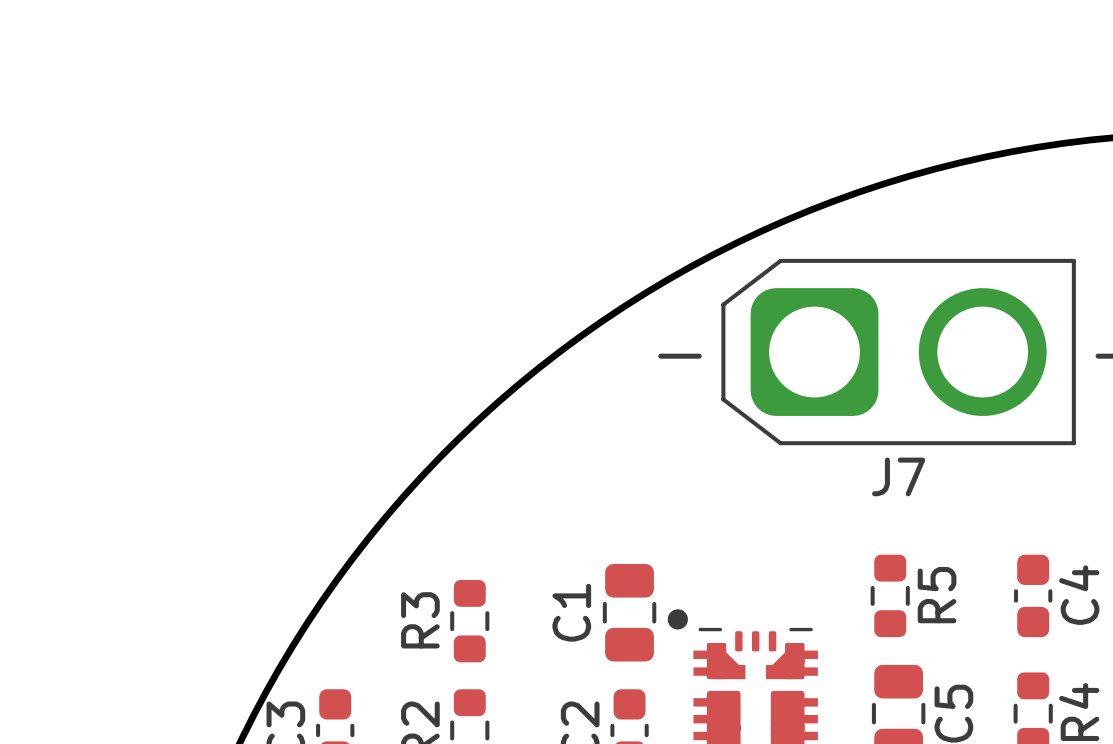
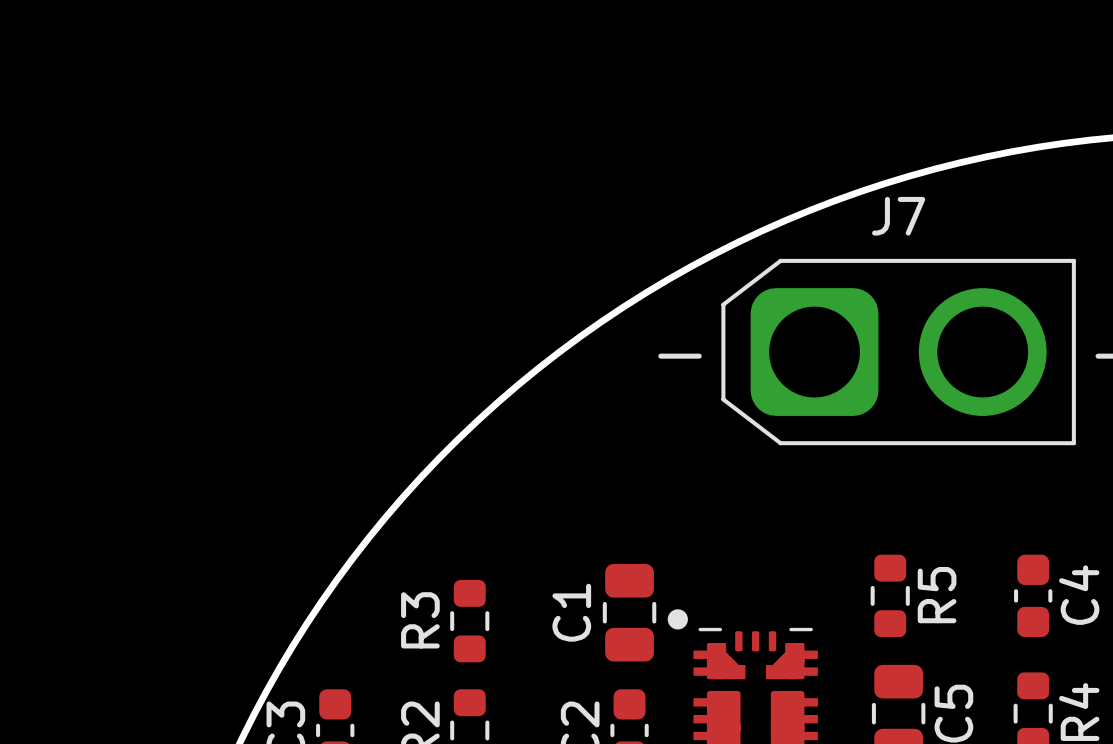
J7 name position: J7 (898, 476) -> J7 (898, 216)

